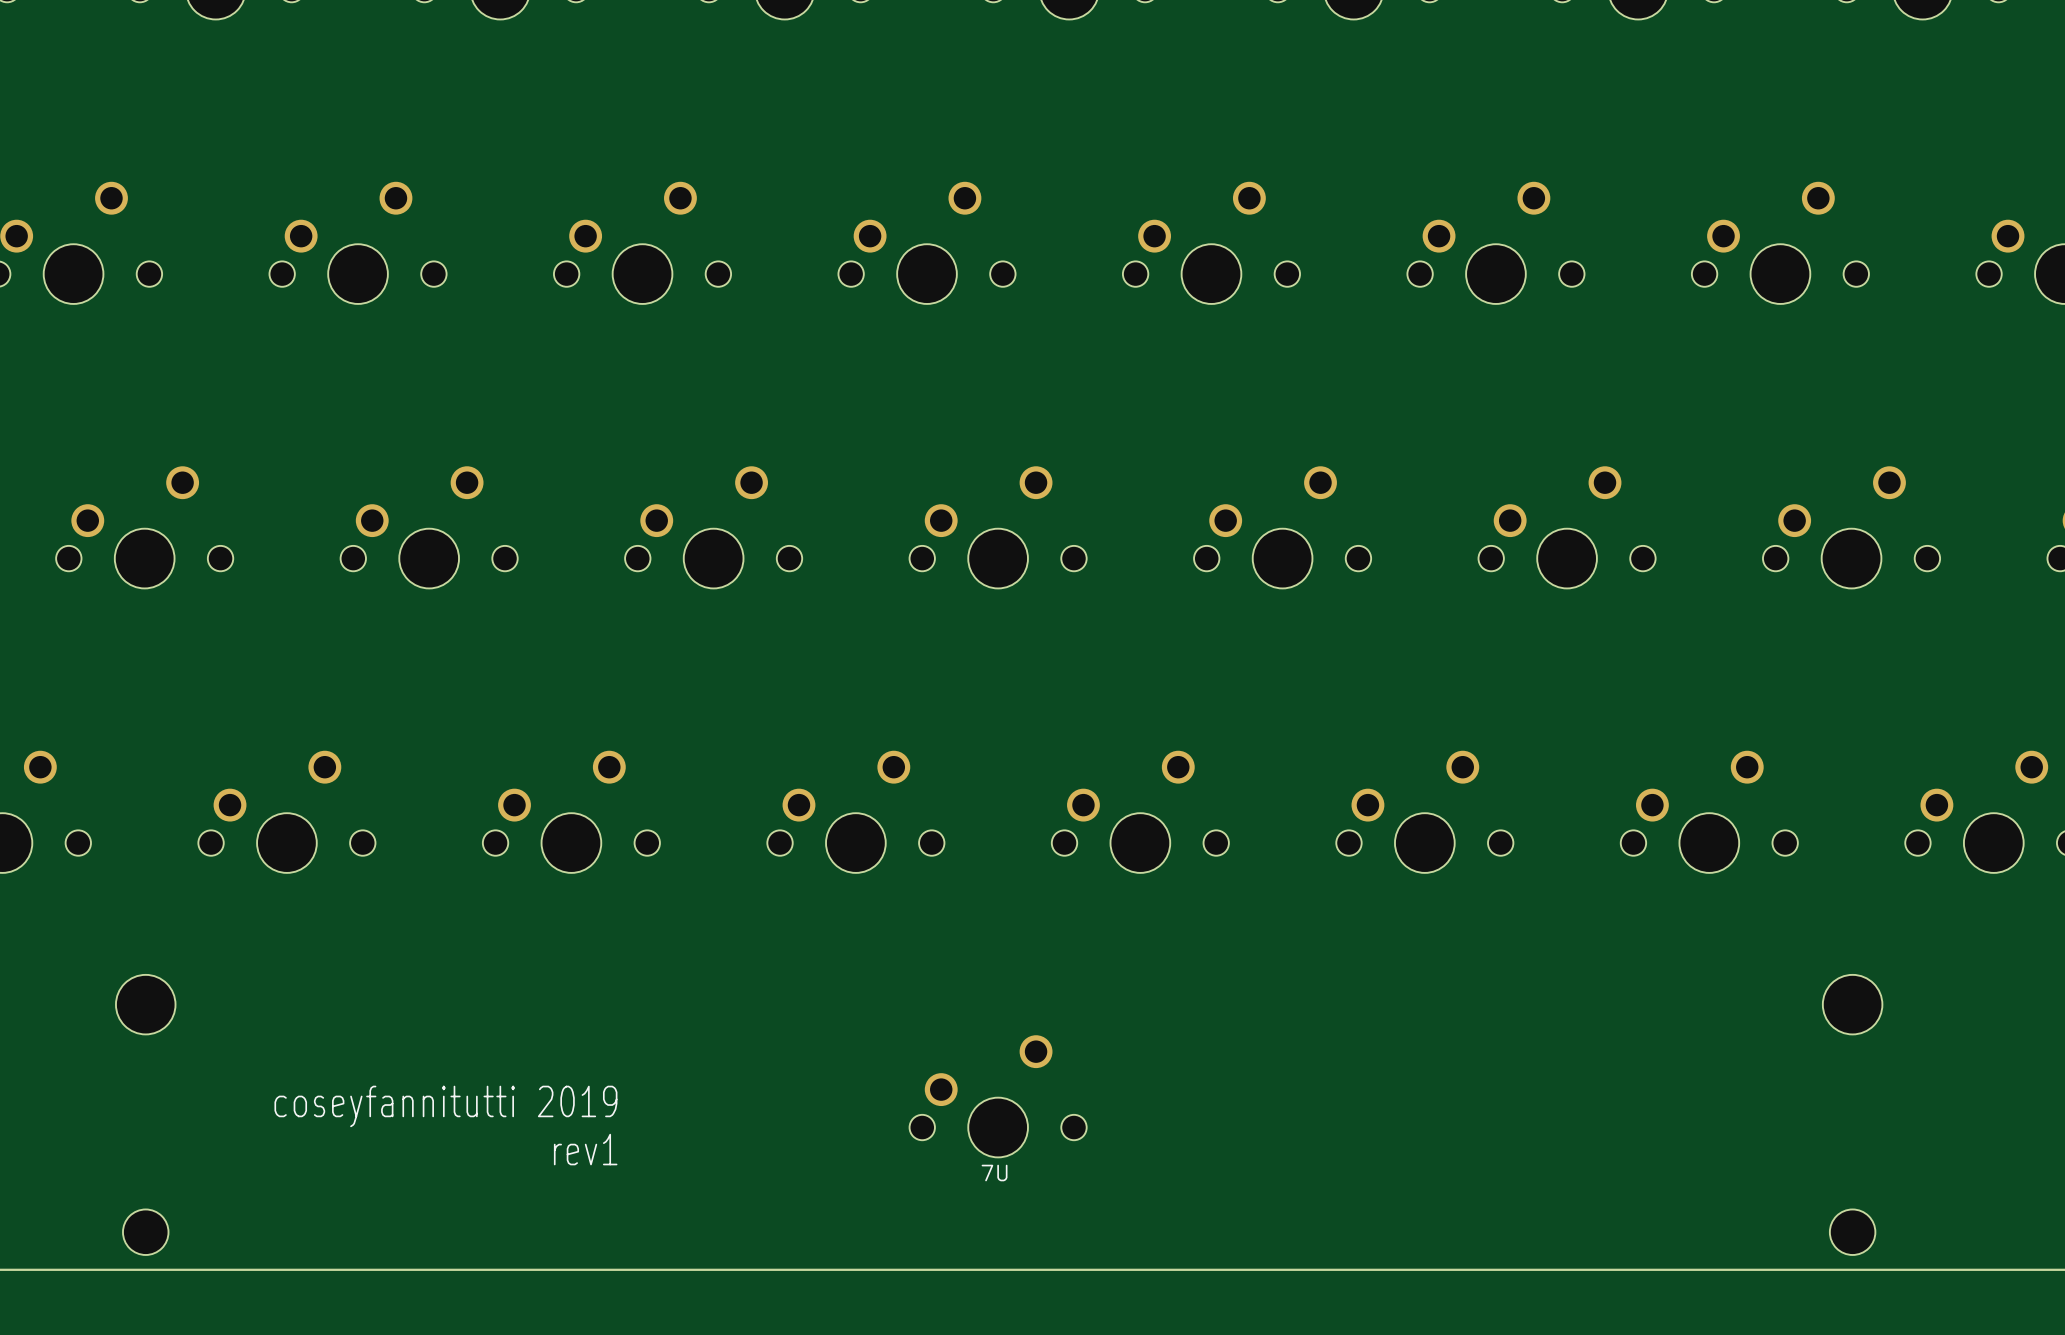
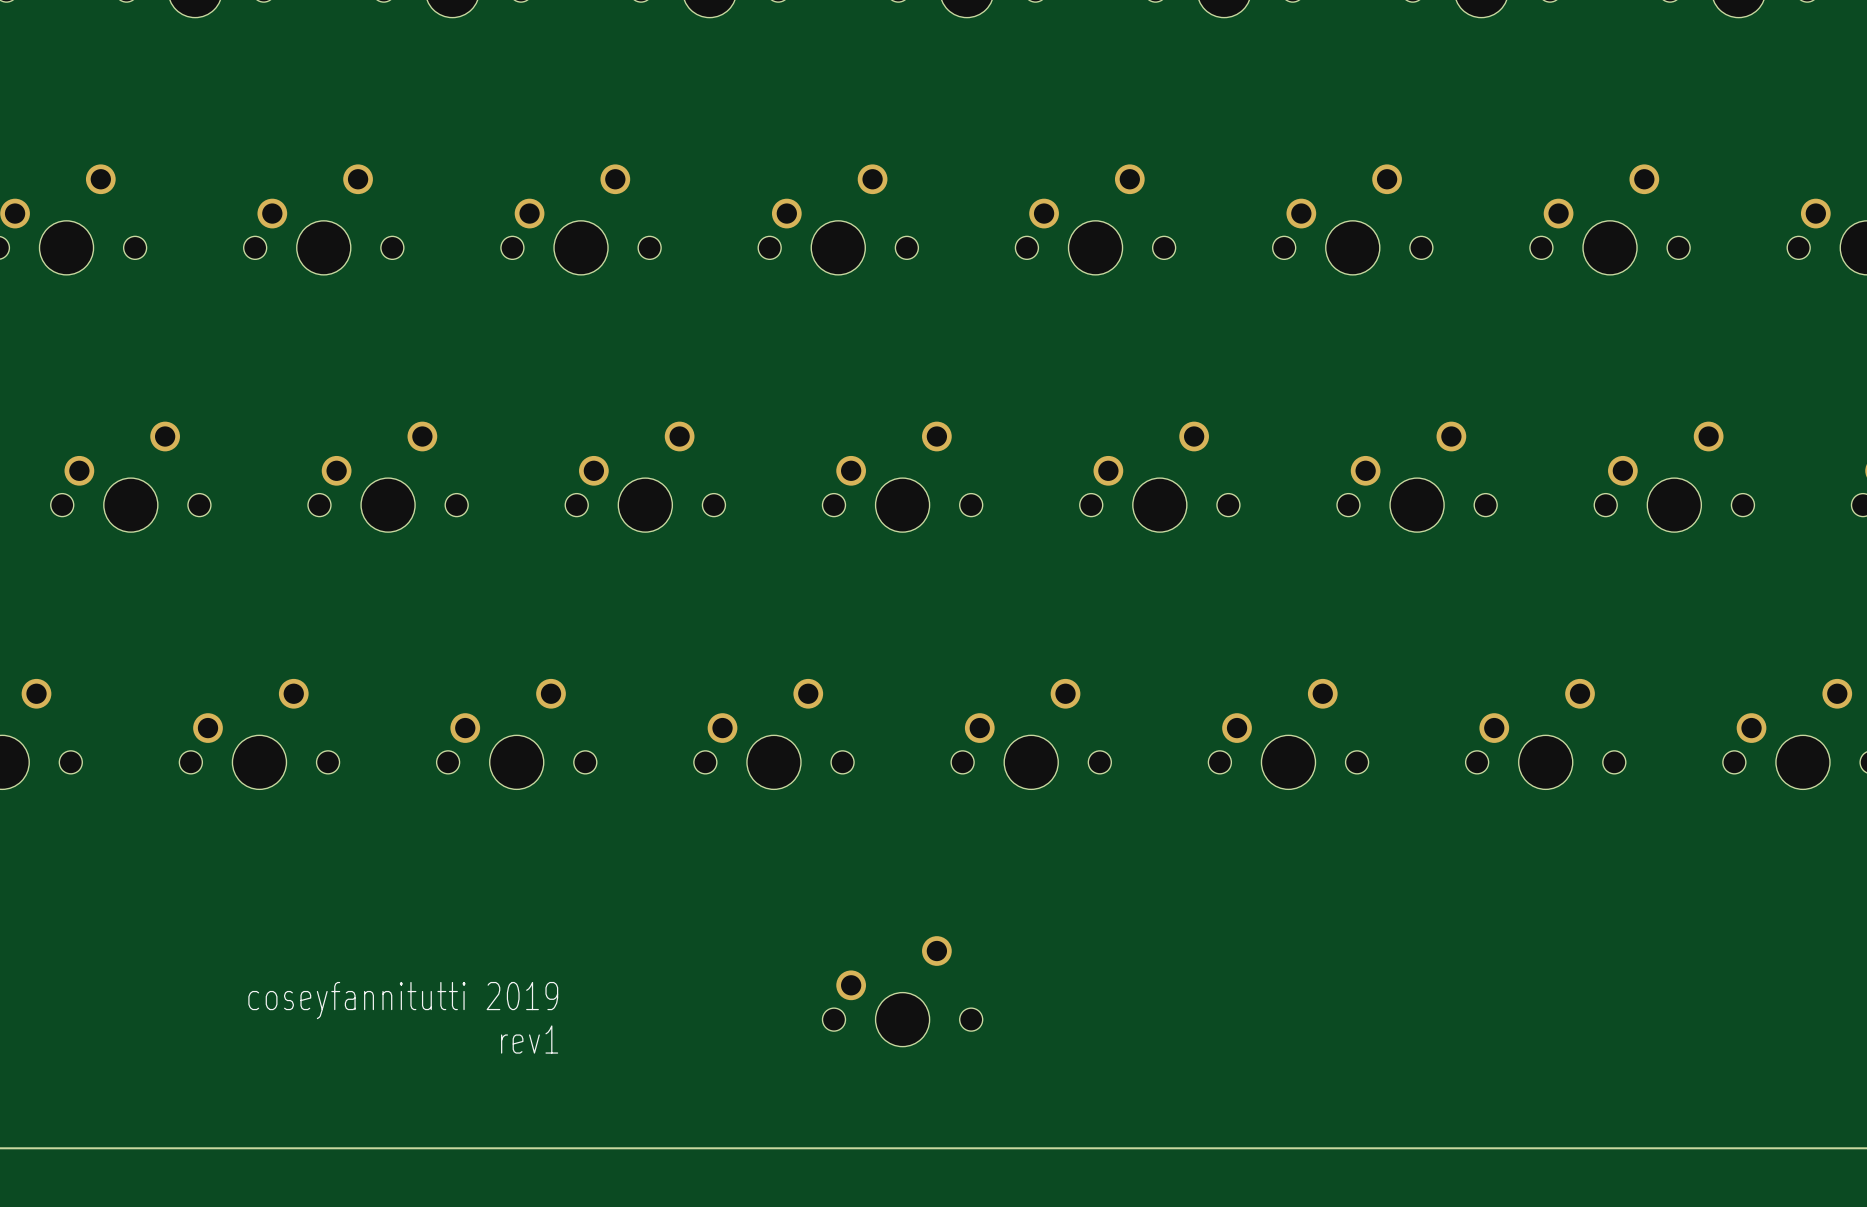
part: 7U (999, 1114) -> none

